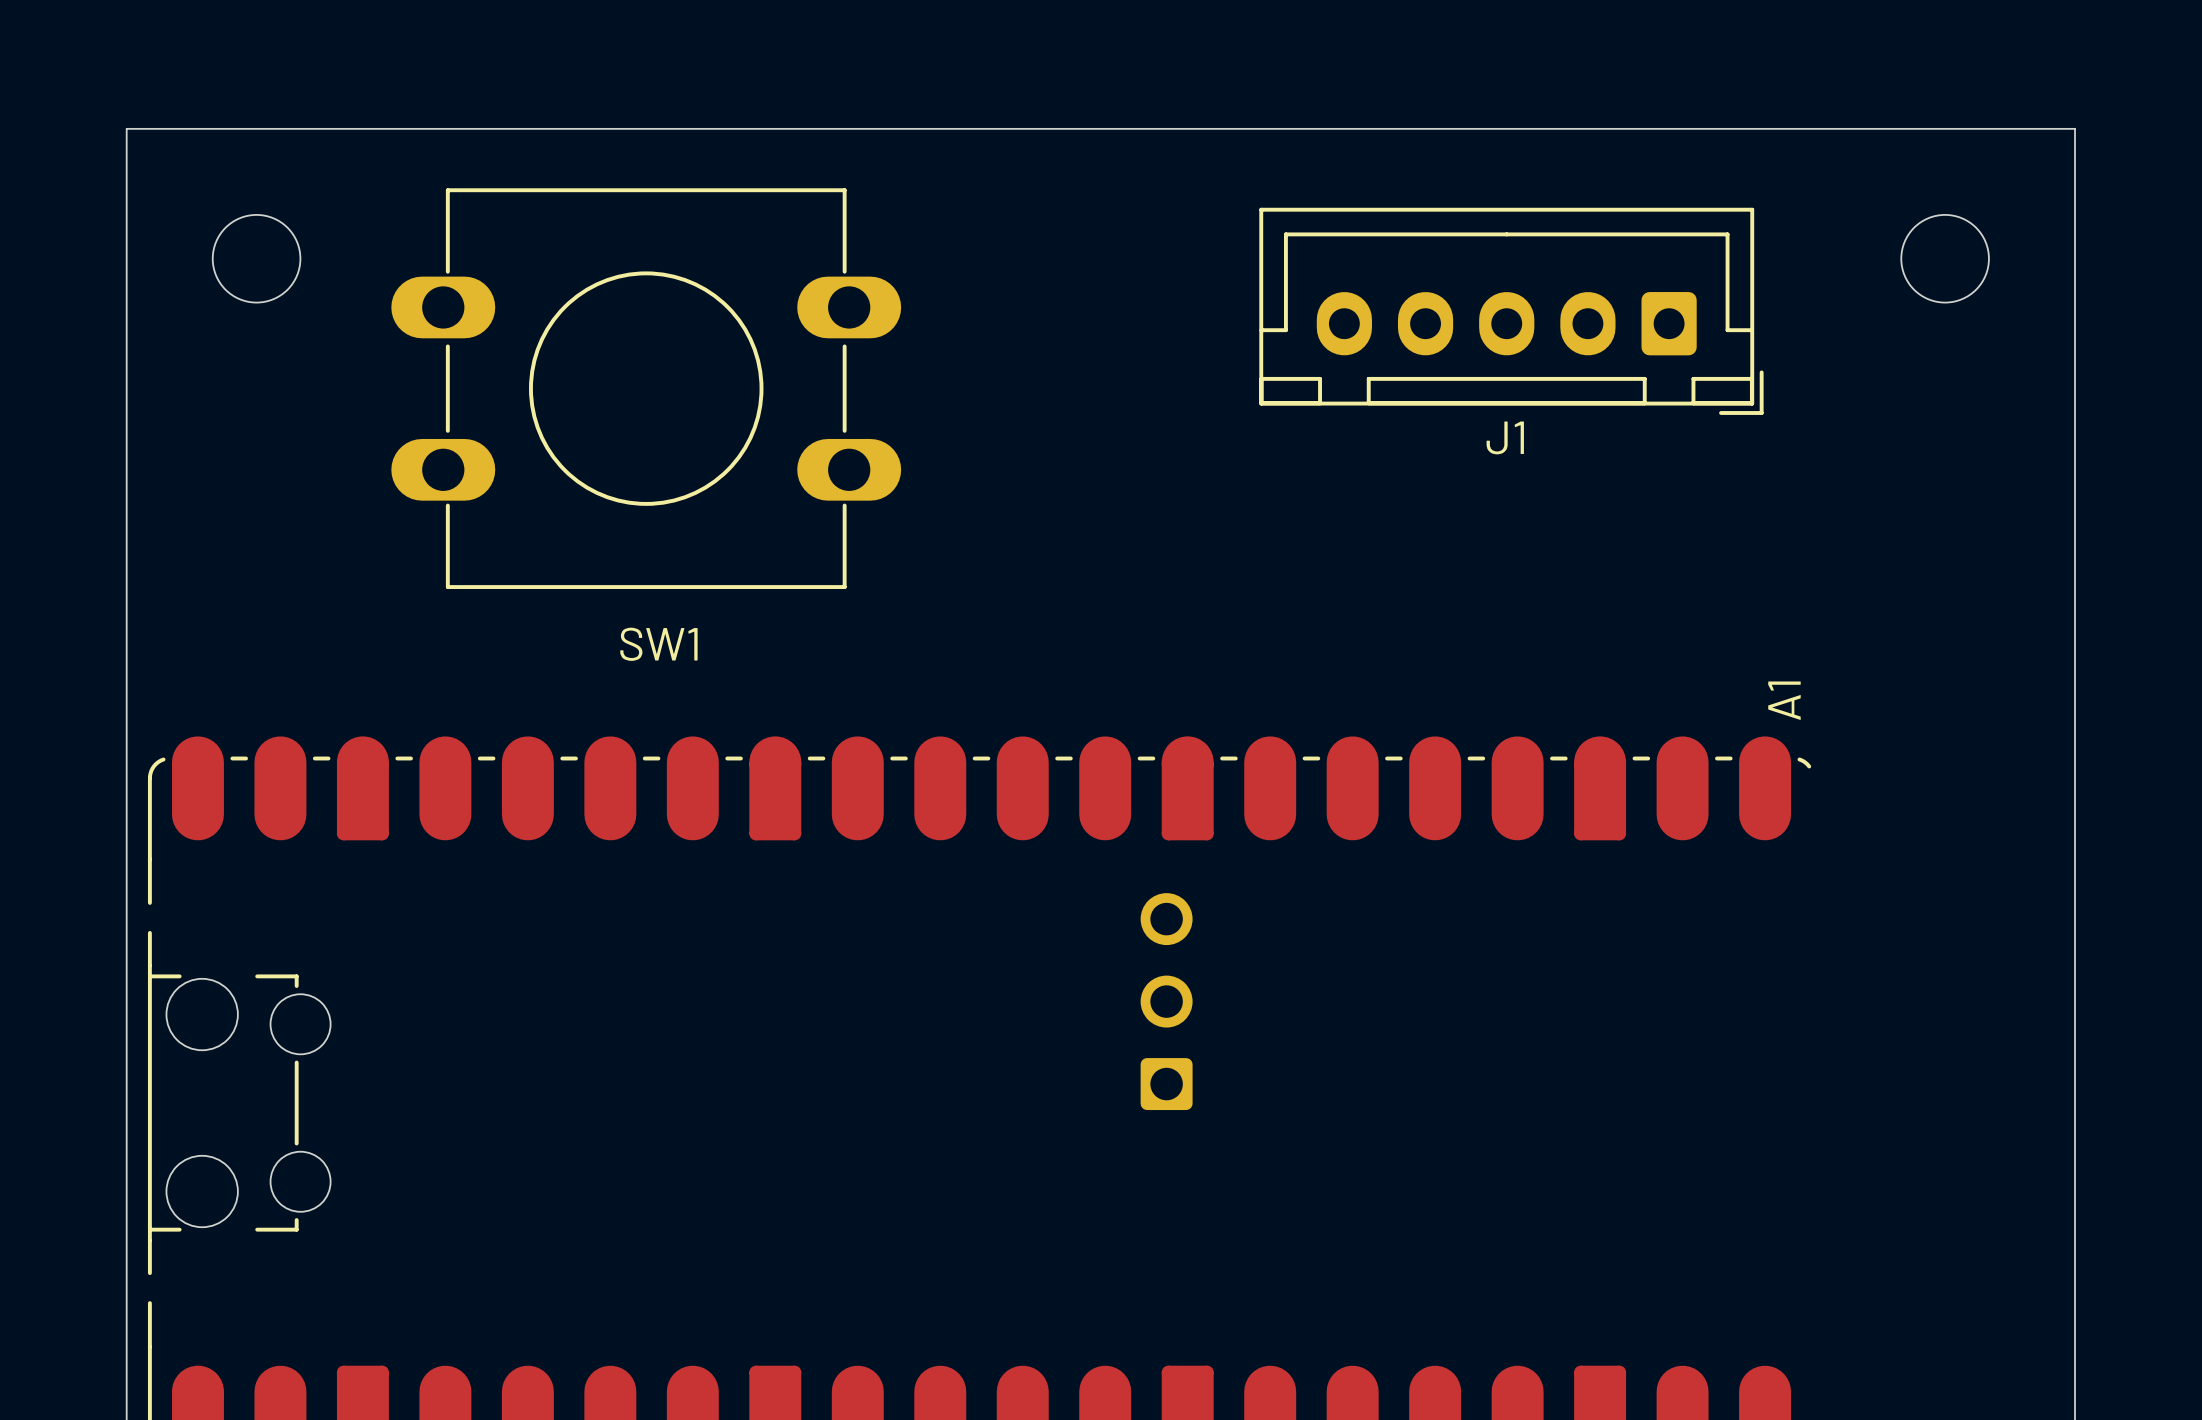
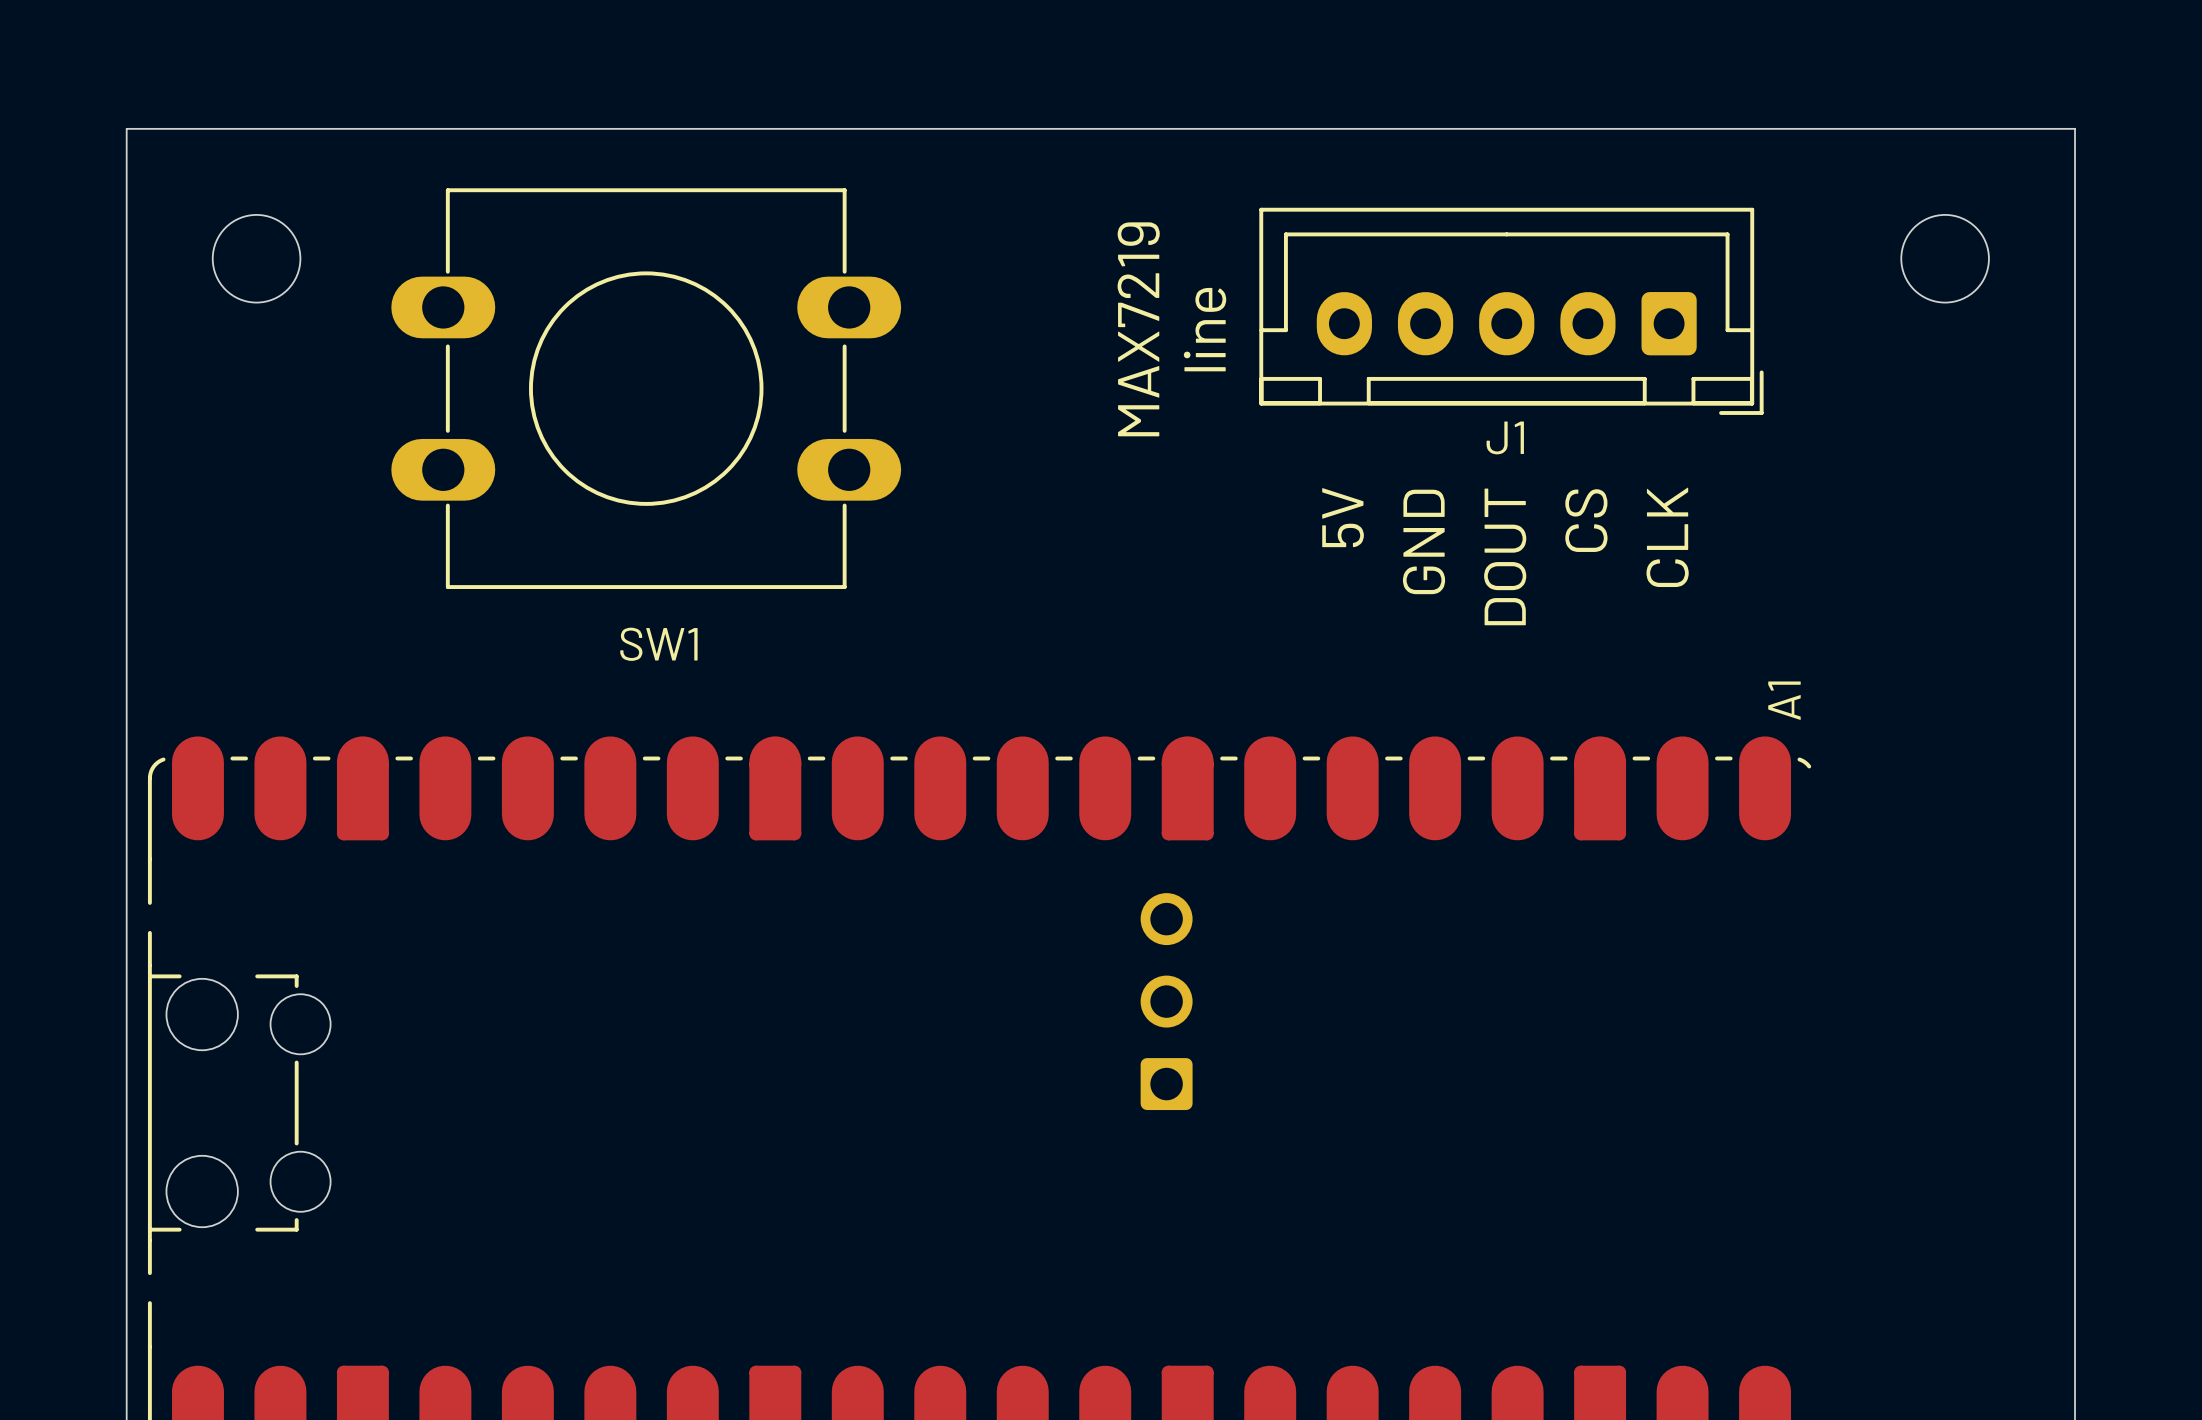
text: none -> MAX7219 (1138, 329)
text: none -> line (1205, 329)
text: none -> 5V (1343, 517)
text: none -> CS (1586, 520)
text: none -> CLK (1667, 537)
text: none -> GND (1424, 541)
text: none -> DOUT (1505, 556)

